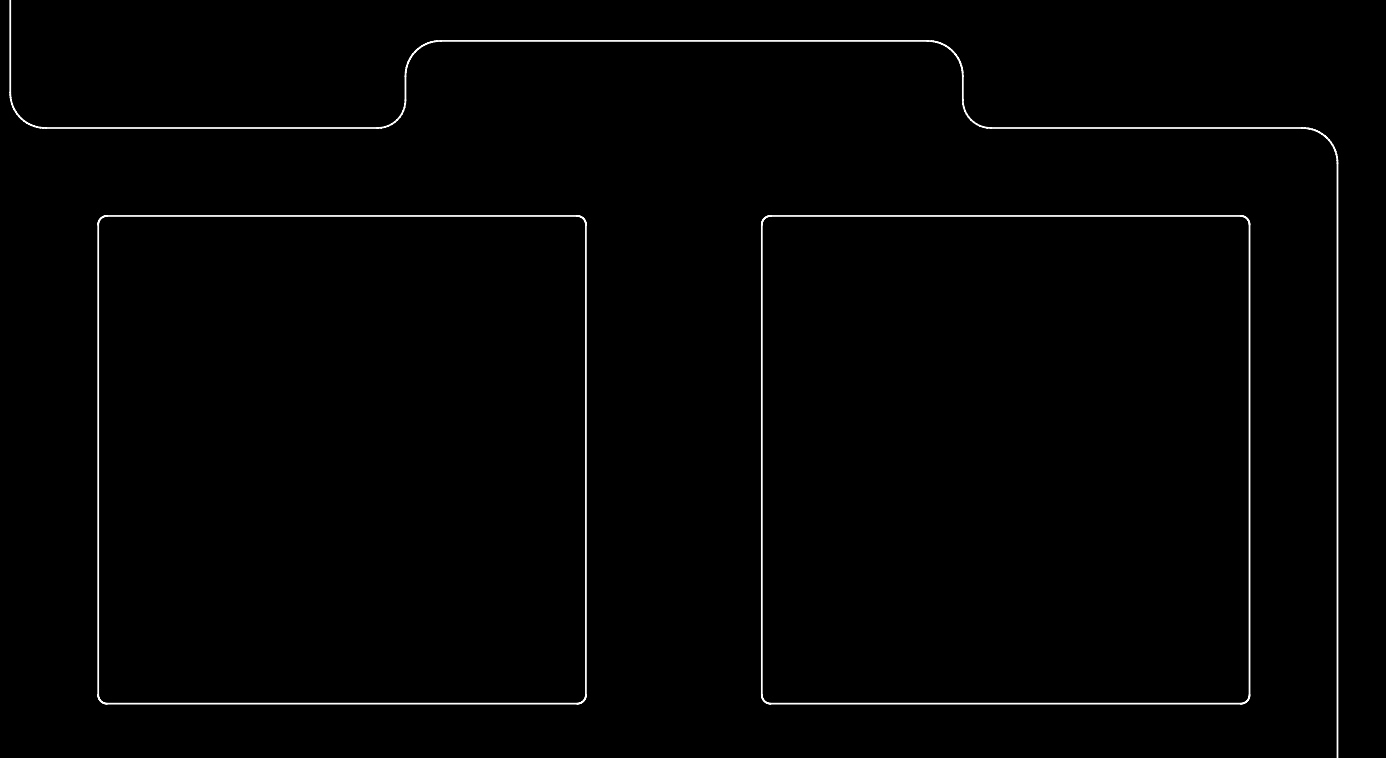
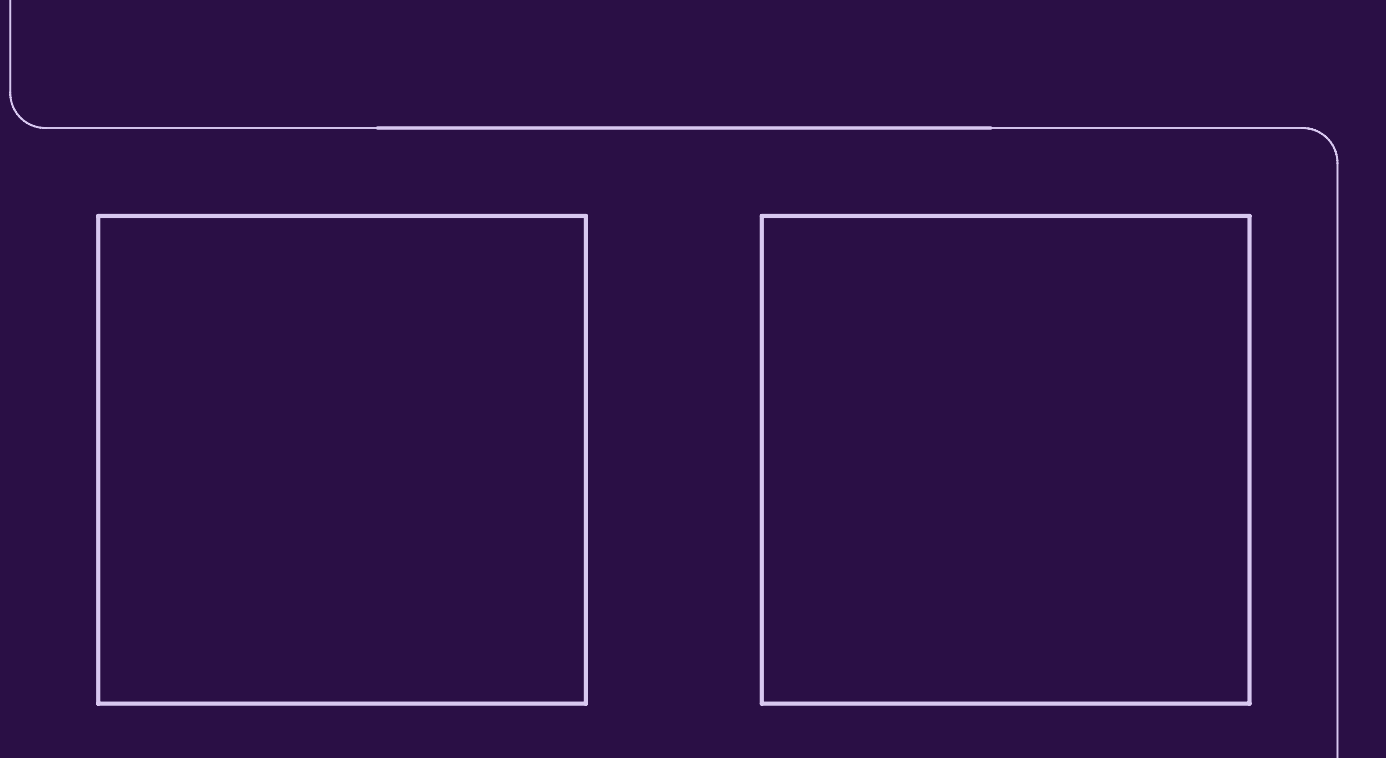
board edge: (990, 127) (973, 122) (964, 110) (962, 70) (956, 55) (944, 45) (927, 40) (434, 41) (418, 48) (408, 61) (405, 72) (405, 103) (401, 114) (391, 124) (377, 127) -> (990, 127) (377, 127)
drawing: none -> [96, 213, 588, 706]
drawing: none -> [759, 213, 1252, 706]
board edge: (578, 216) (583, 218) (585, 224) (585, 694) (583, 701) (577, 703) (106, 703) (100, 701) (98, 694) (98, 224) (100, 218) (106, 215) (578, 216) -> none
board edge: (1241, 216) (1246, 218) (1249, 224) (1249, 694) (1246, 701) (1240, 703) (770, 703) (764, 701) (761, 694) (761, 224) (764, 218) (770, 215) (1241, 216) -> none

